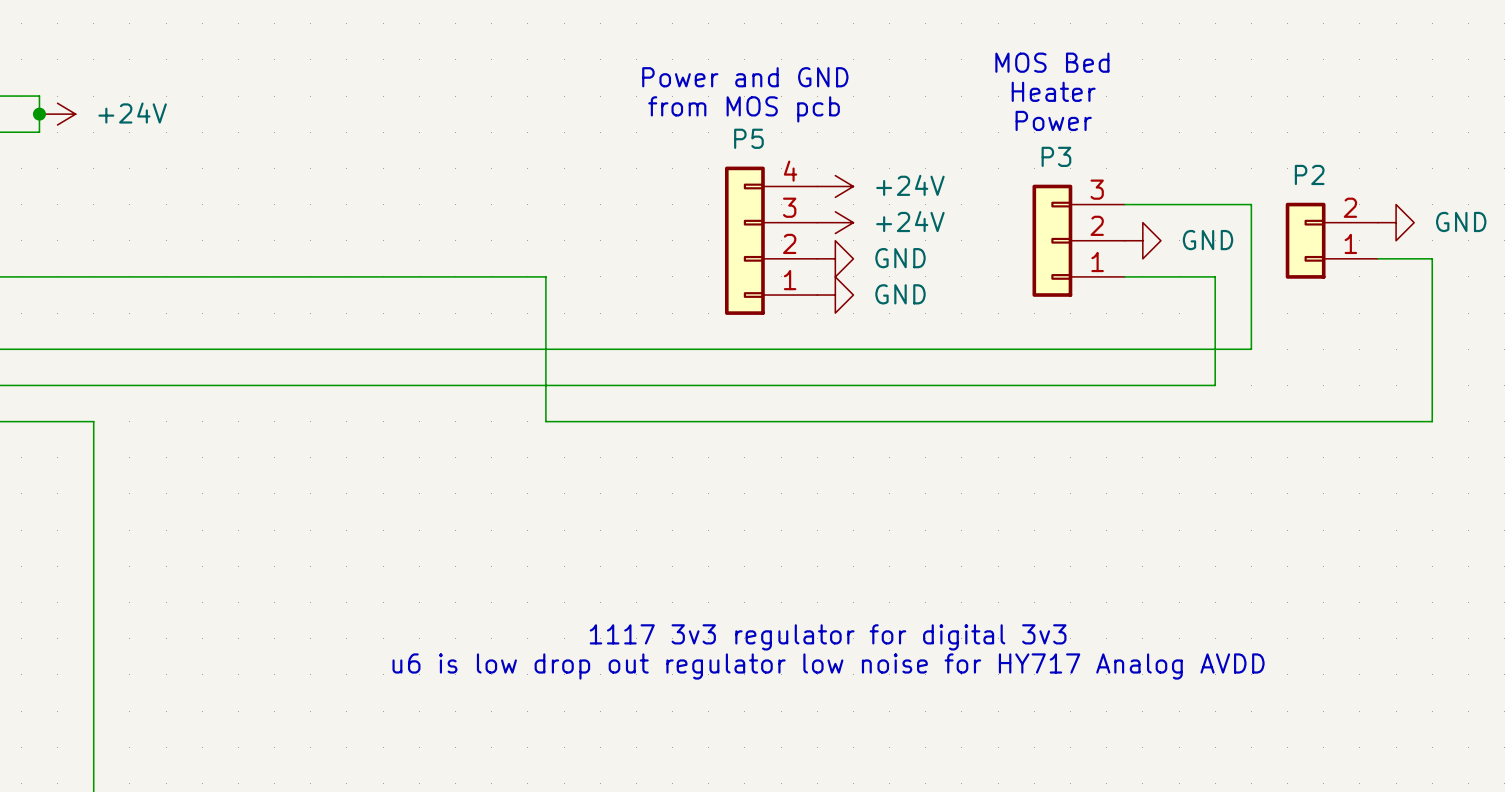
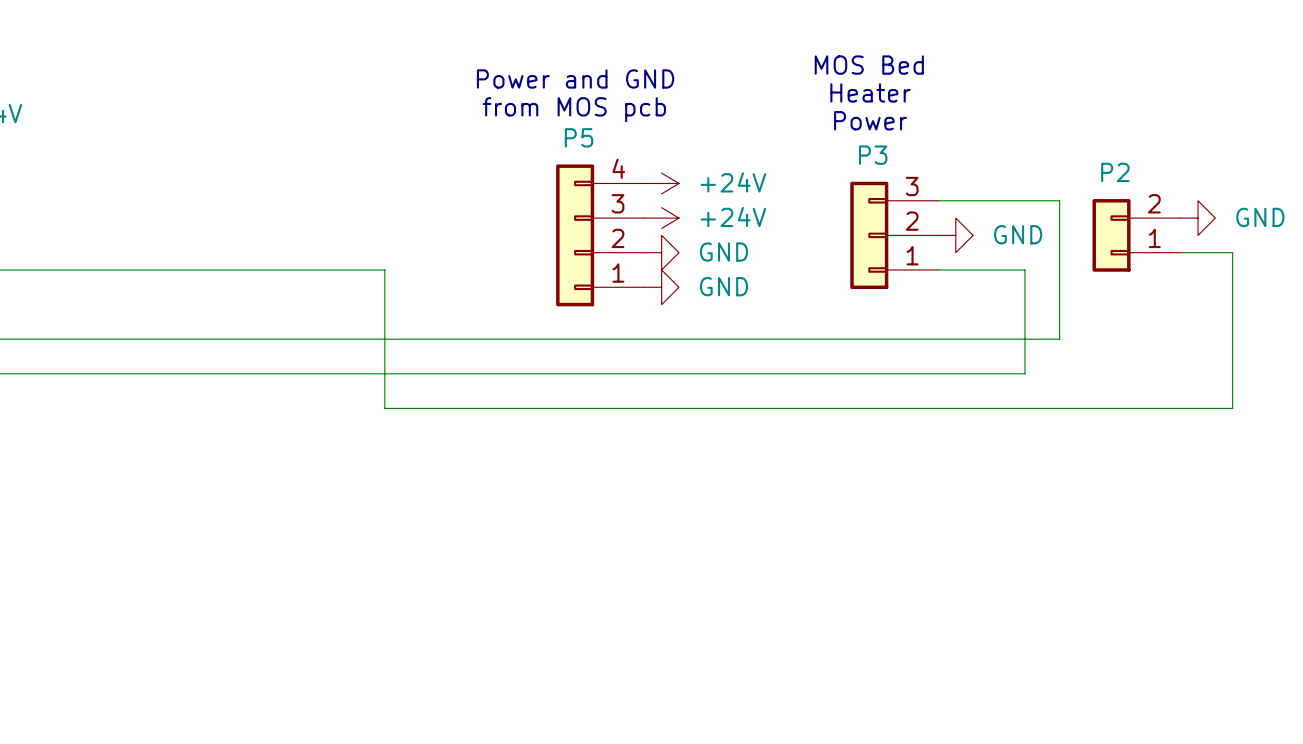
text: 1117 3v3 regulator for digital 3v3 (828, 637) -> none
text: u6 is low drop out regulator low noise for HY717 Analog AVDD (828, 666) -> none

